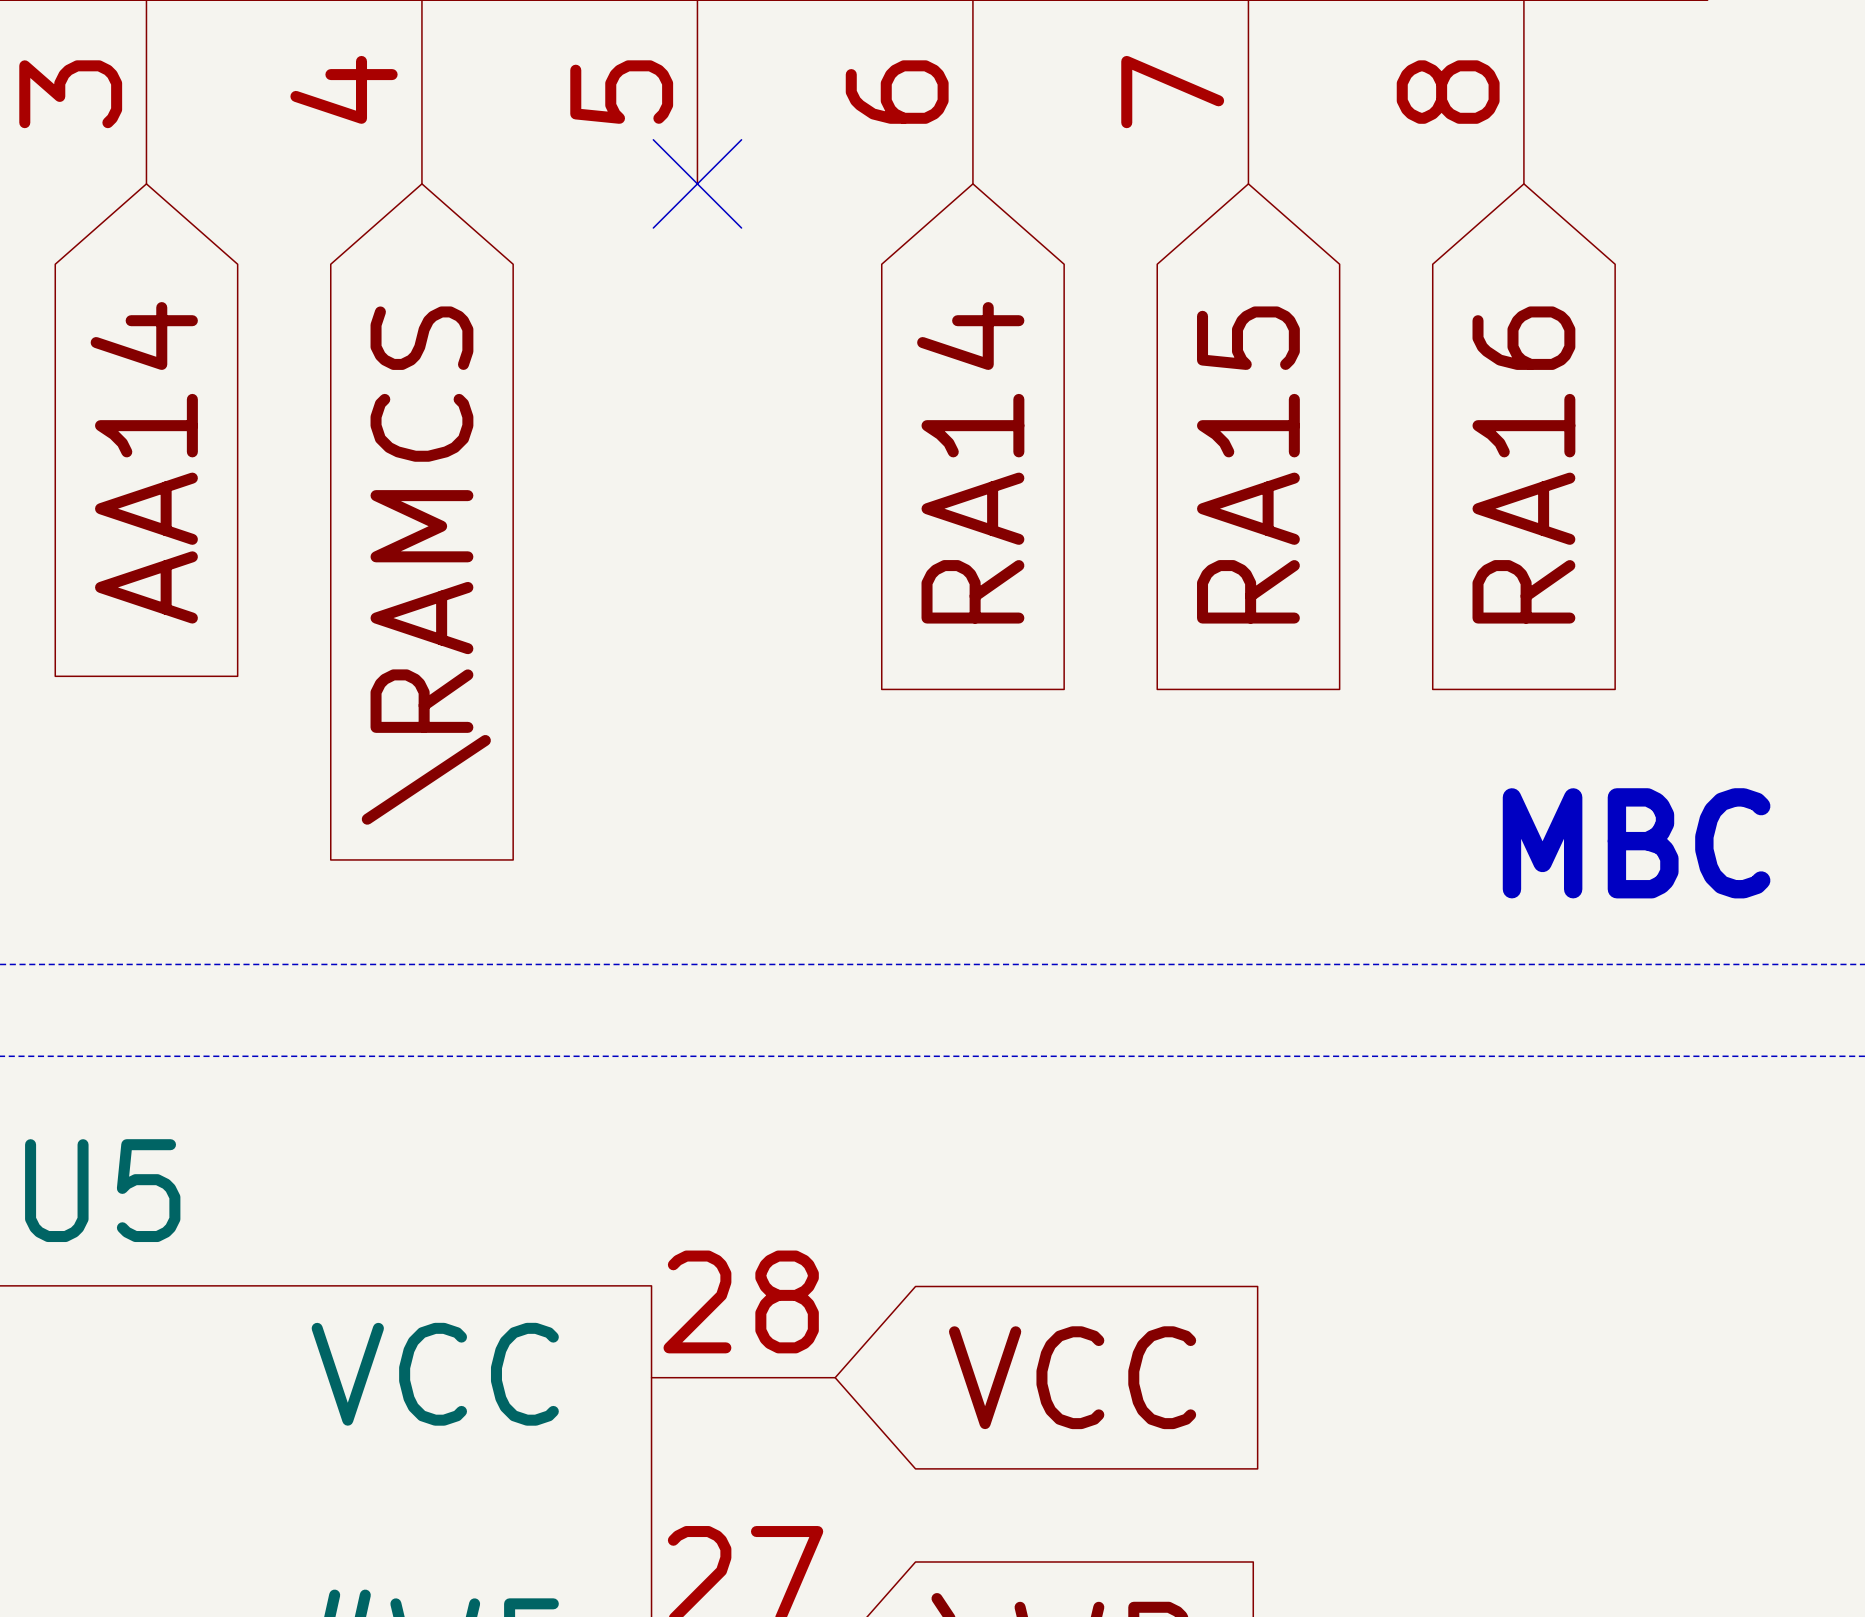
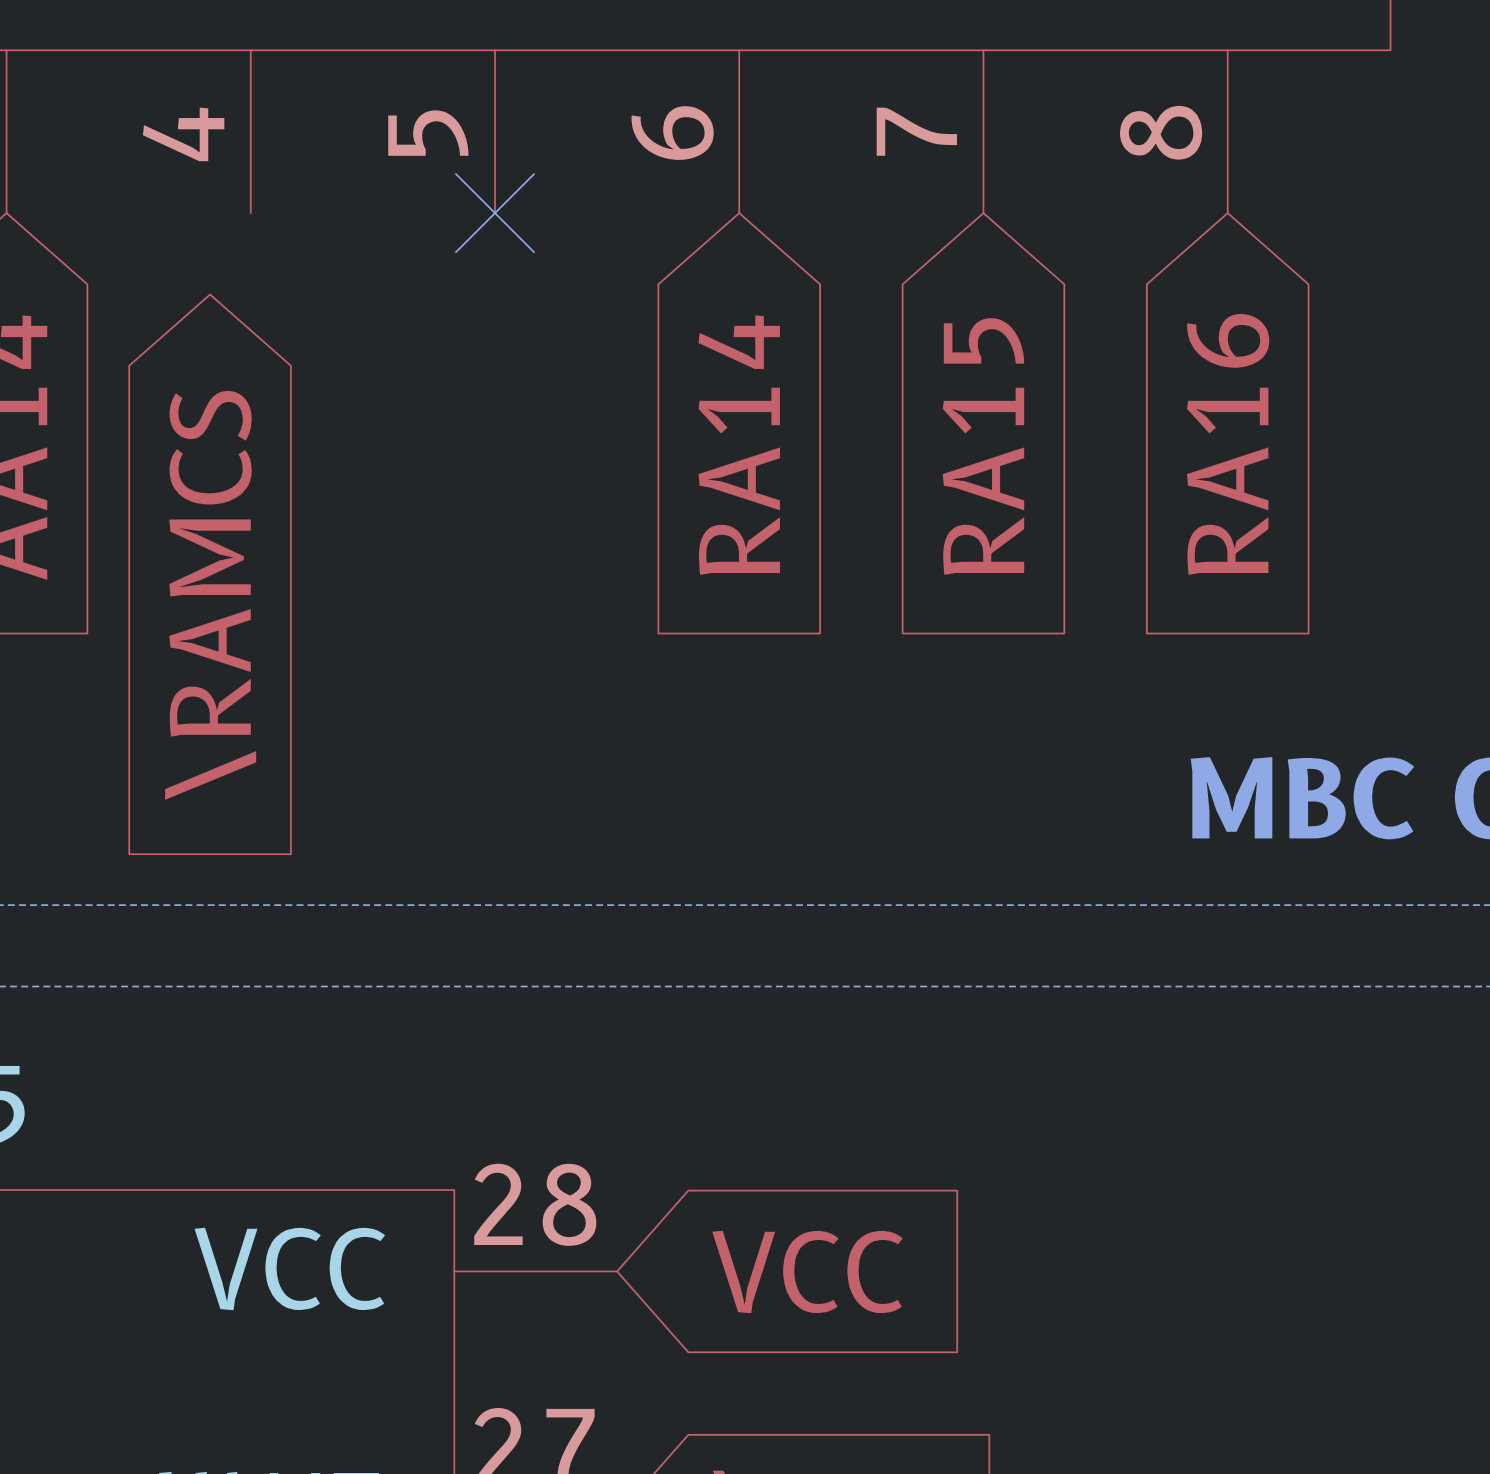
global label position: \RAMCS (426, 565) -> \RAMCS (210, 595)

